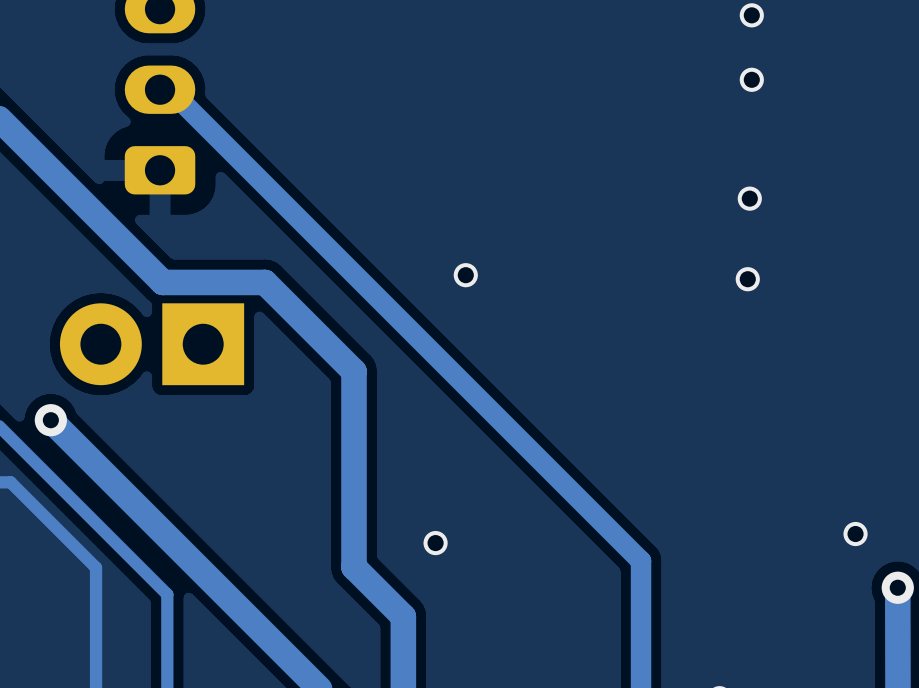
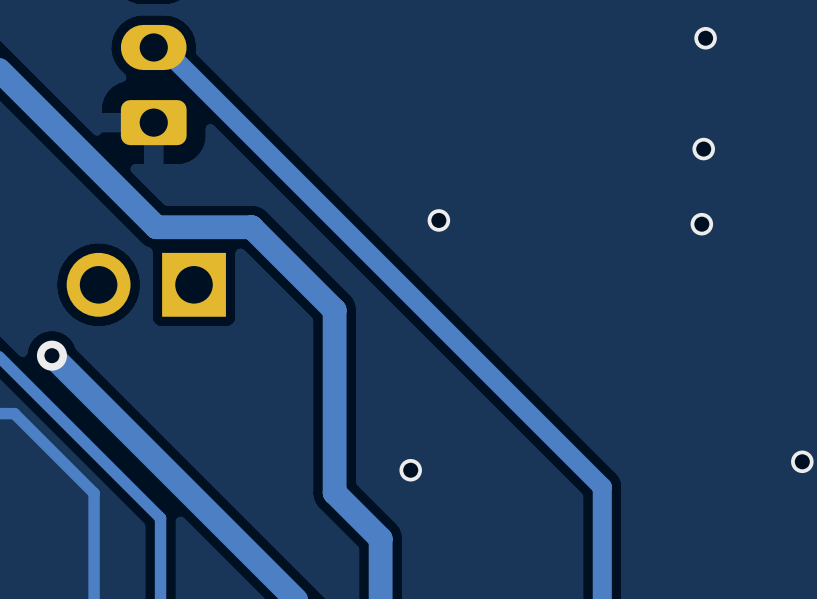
part footprint: [59, 303, 245, 386] -> [66, 252, 226, 317]

